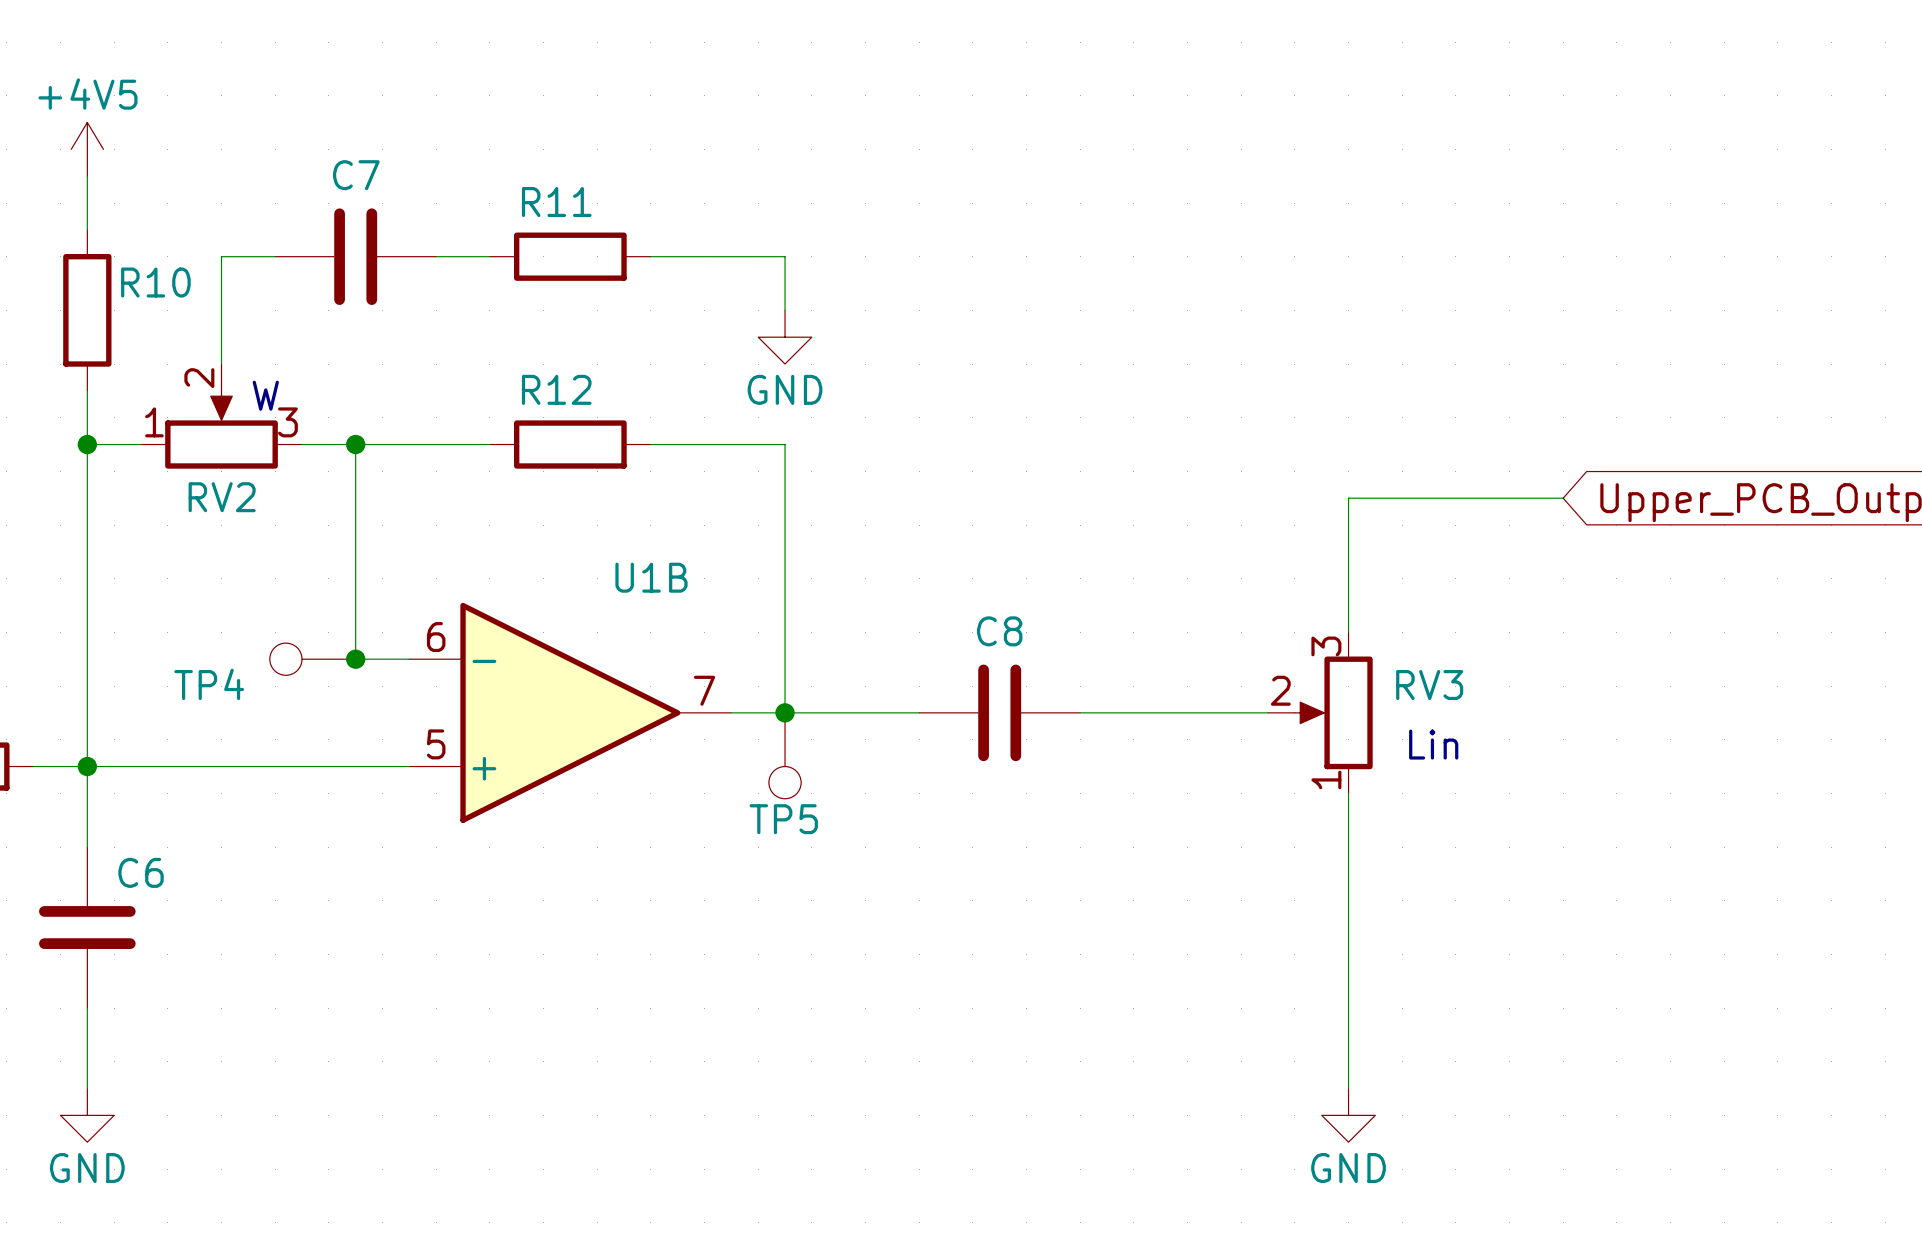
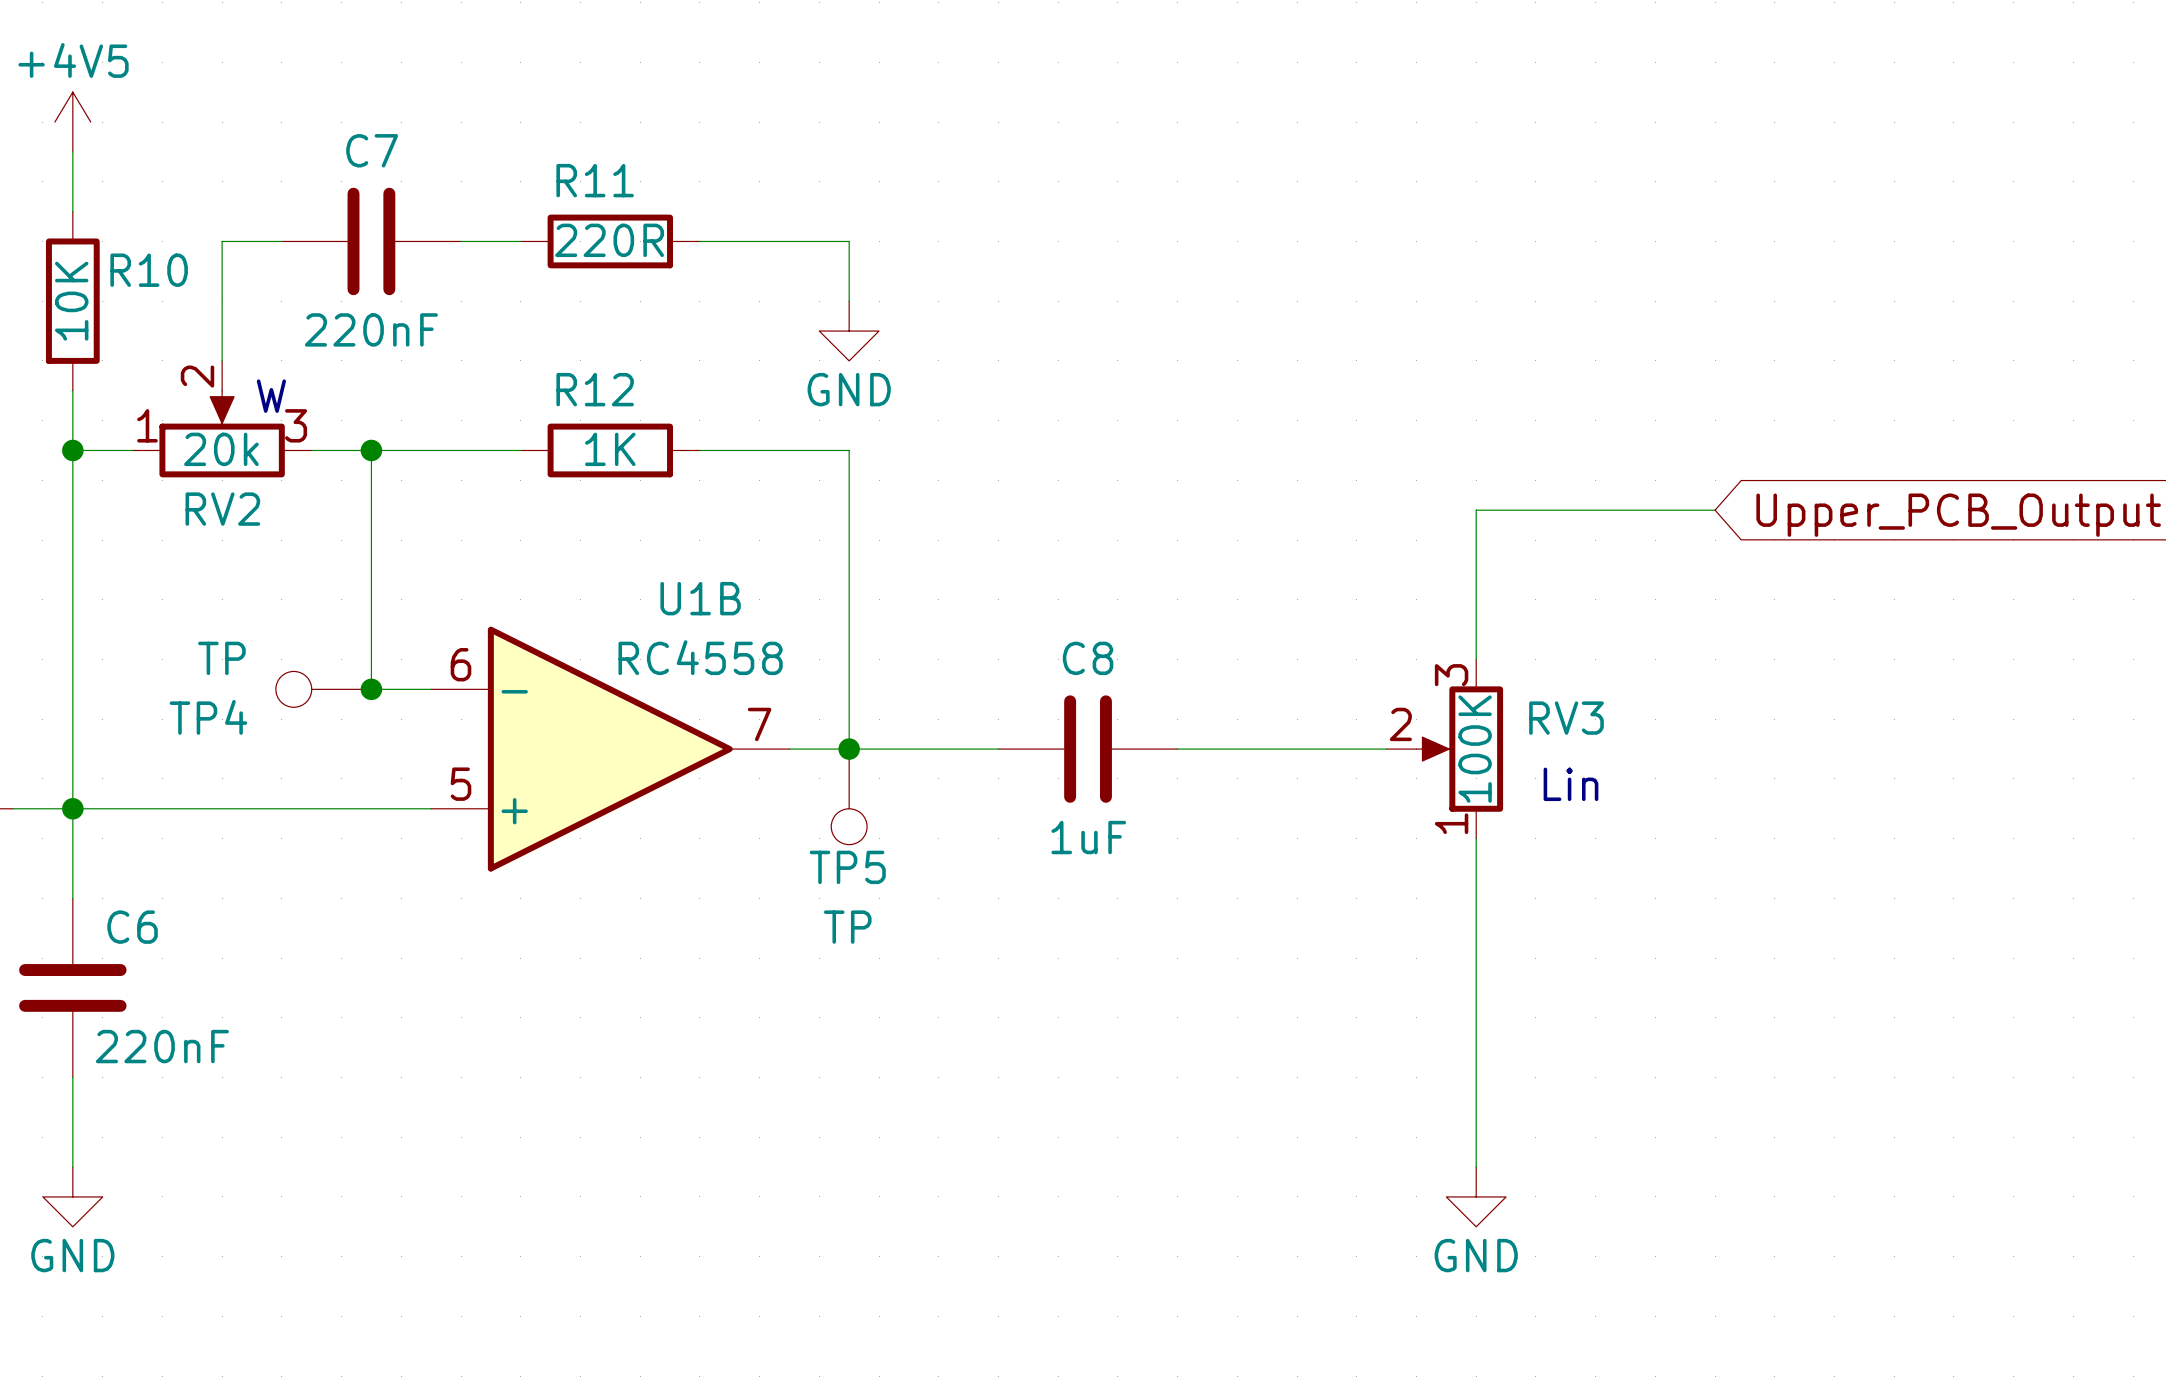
R11 value: none -> 220R (609, 240)
R10 value: none -> 10K (71, 301)
C7 value: none -> 220nF (371, 329)
RV2 value: none -> 20k (221, 449)
R12 value: none -> 1K (610, 449)
U1B value: none -> RC4558 (700, 657)
TP4 value: none -> TP (221, 658)
RV3 value: none -> 100K (1475, 749)
C8 value: none -> 1uF (1088, 837)
TP5 value: none -> TP (847, 927)
C6 value: none -> 220nF (162, 1046)

